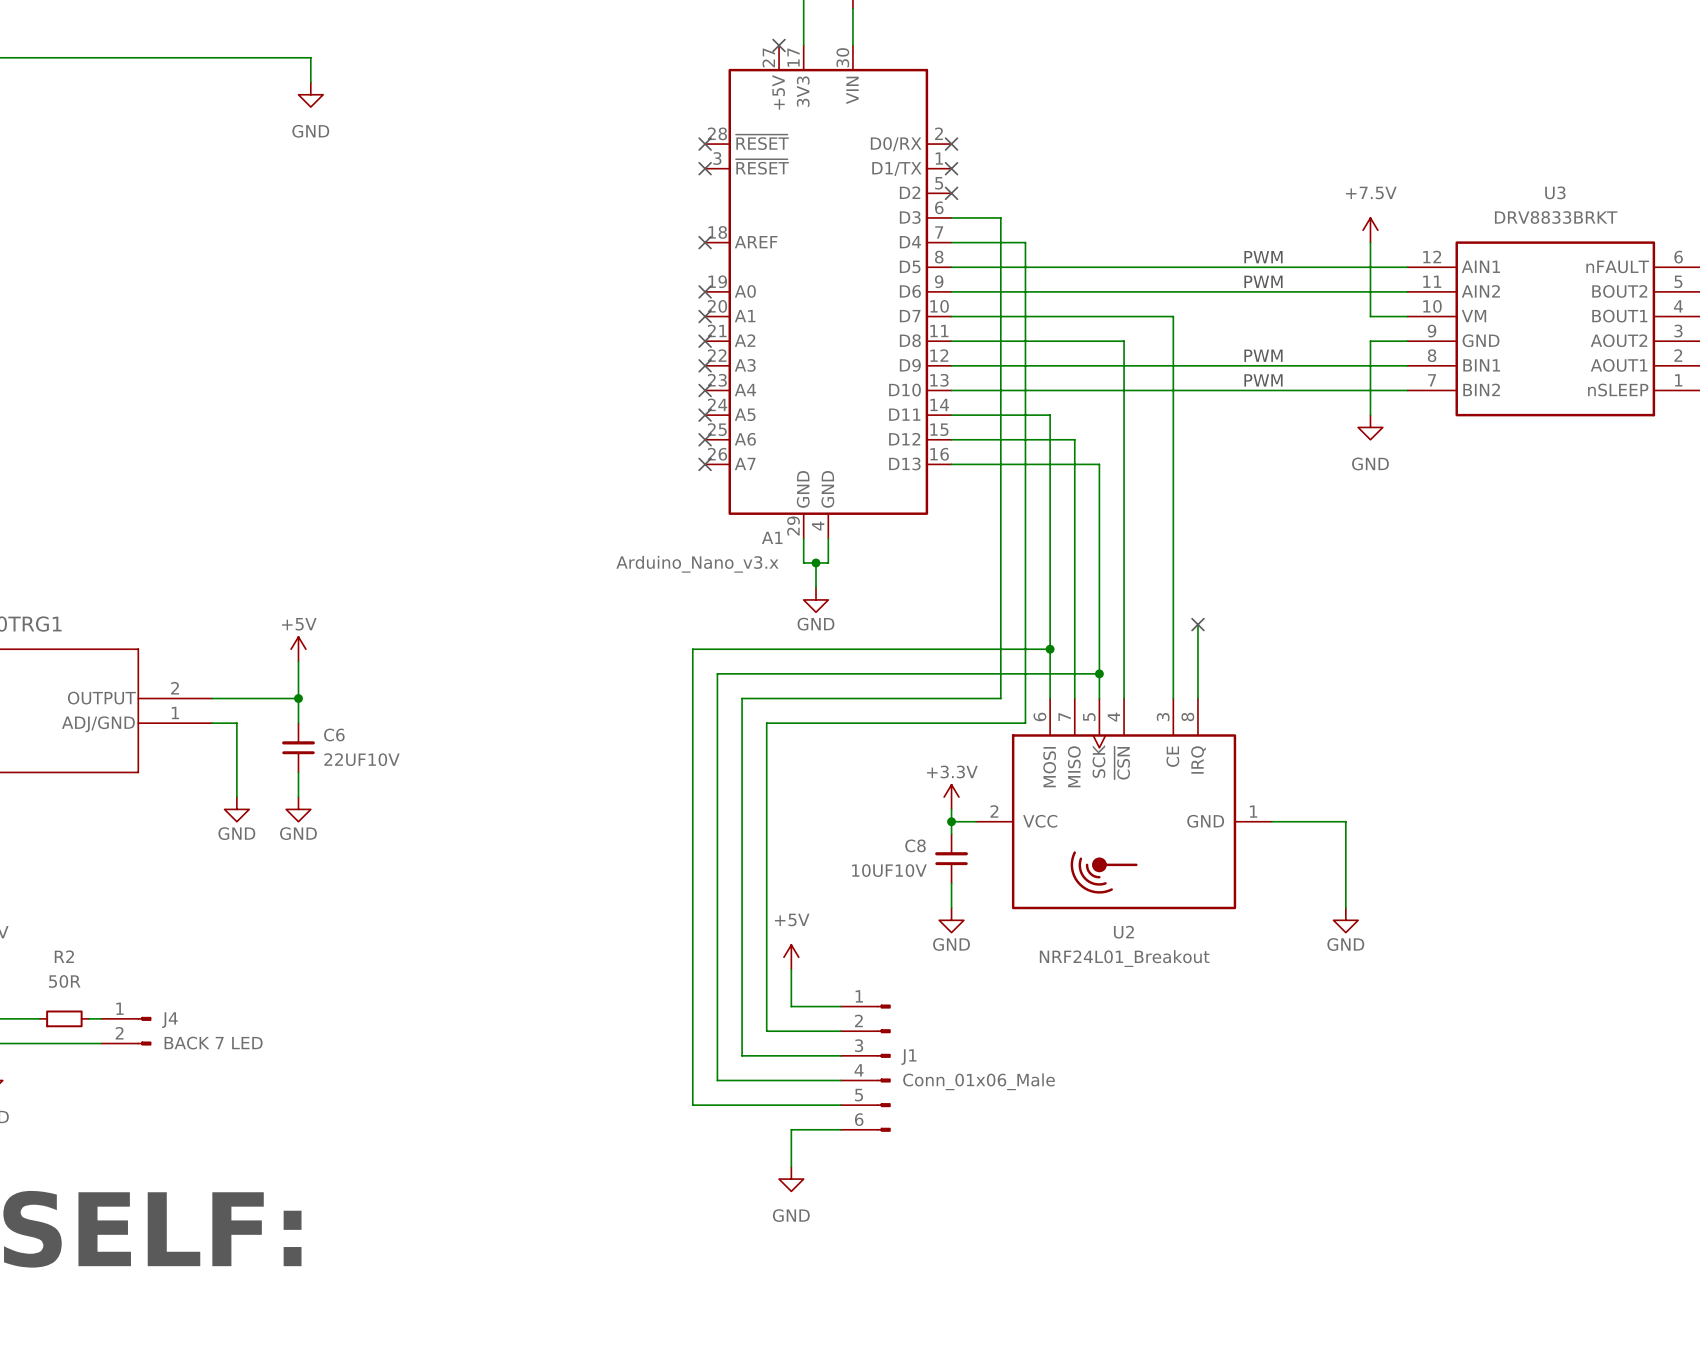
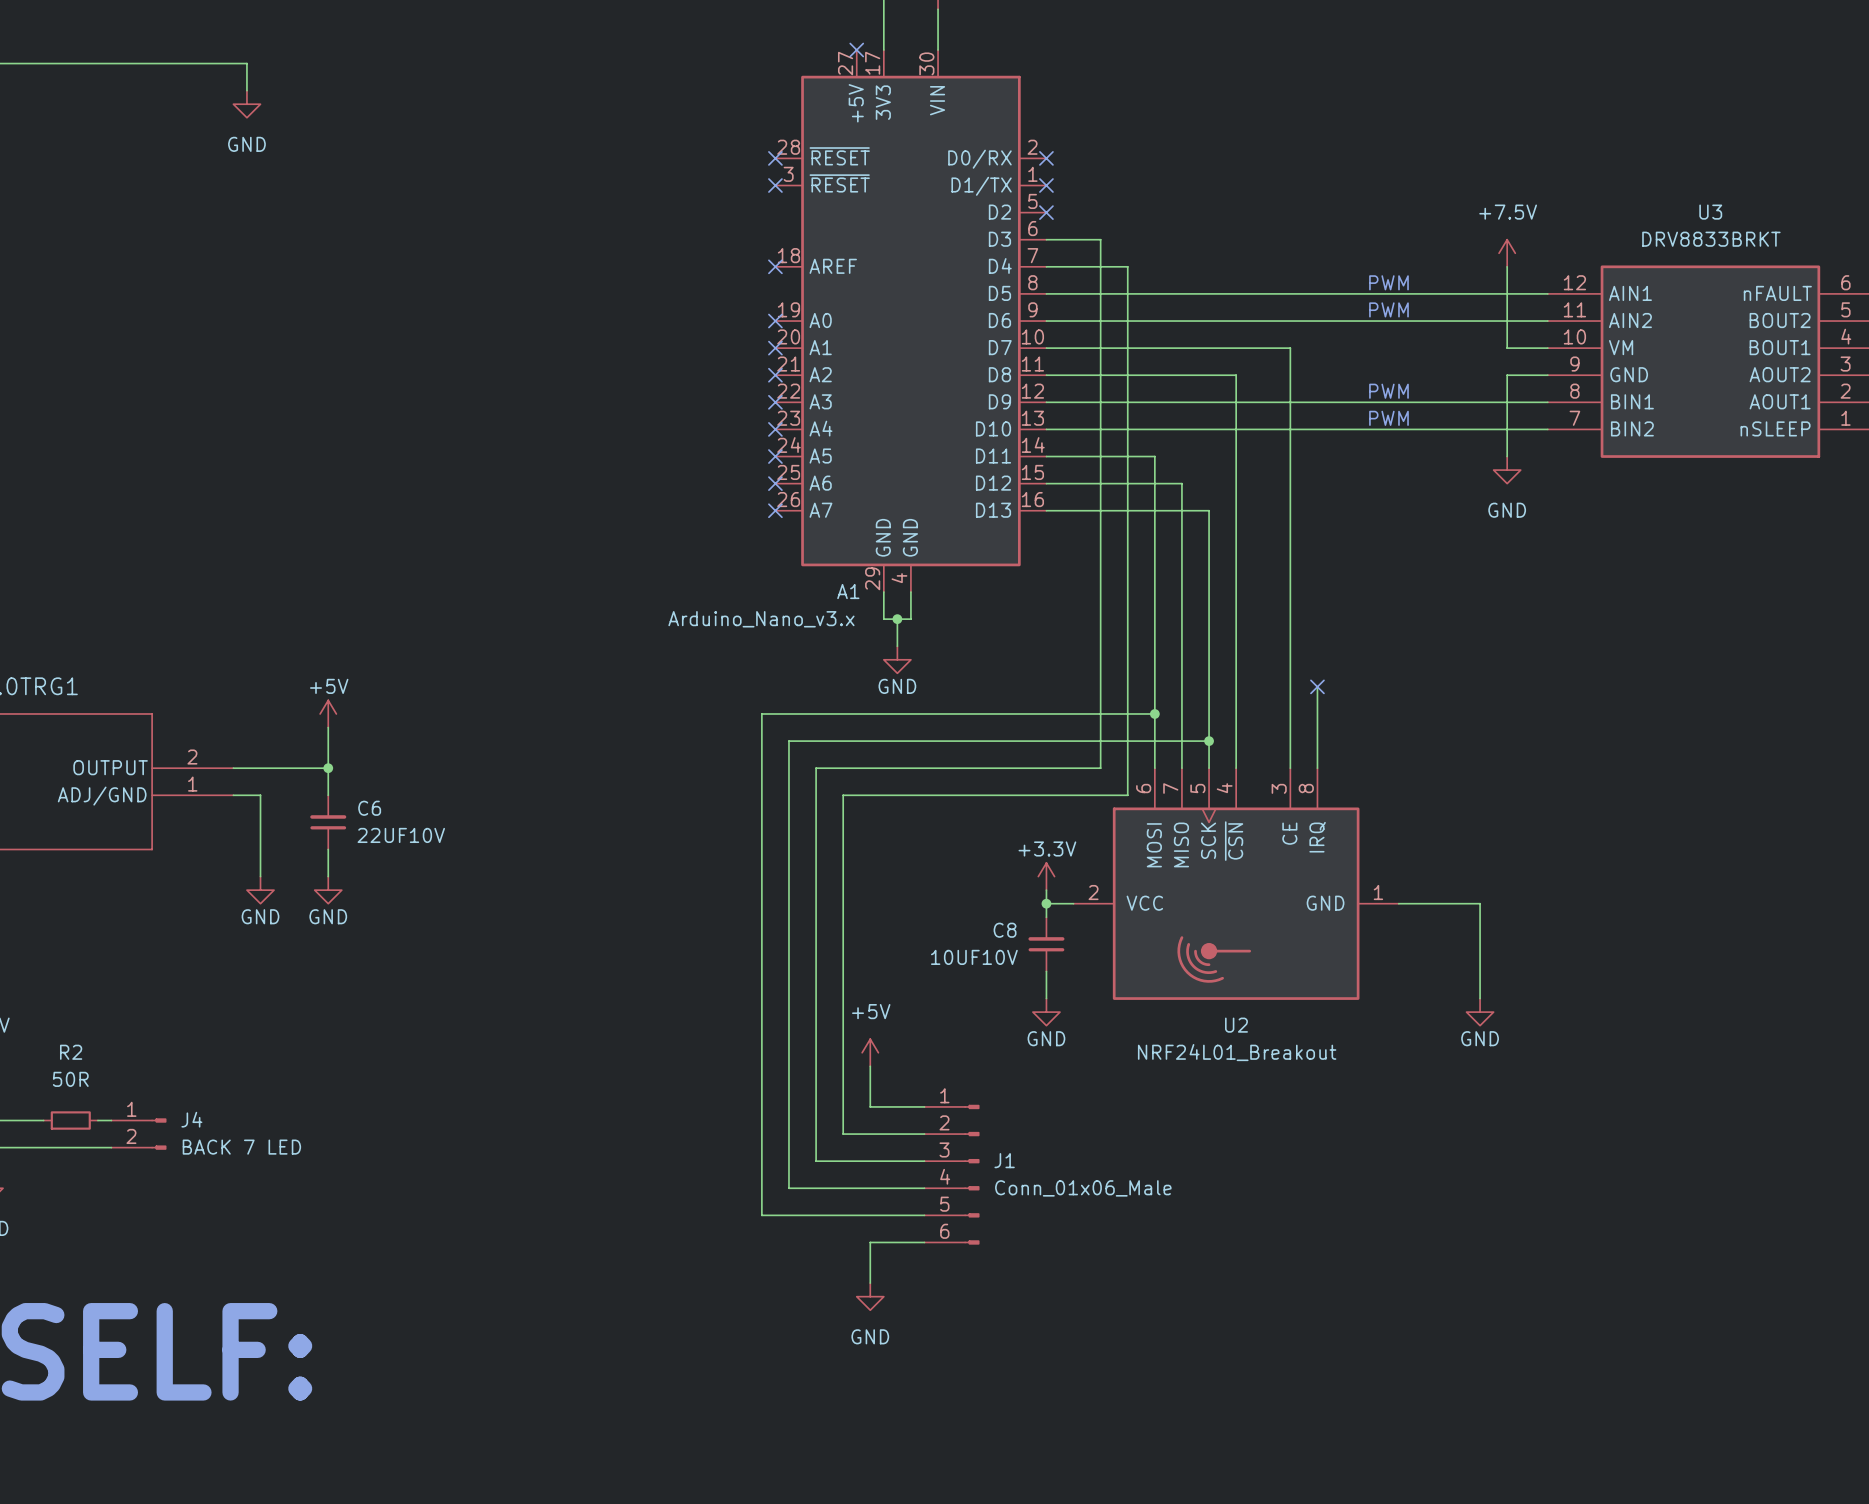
wire: (224, 57) (310, 57) (310, 82) -> (246, 63) (246, 90)
power symbol position: GND (310, 94) -> GND (246, 104)

